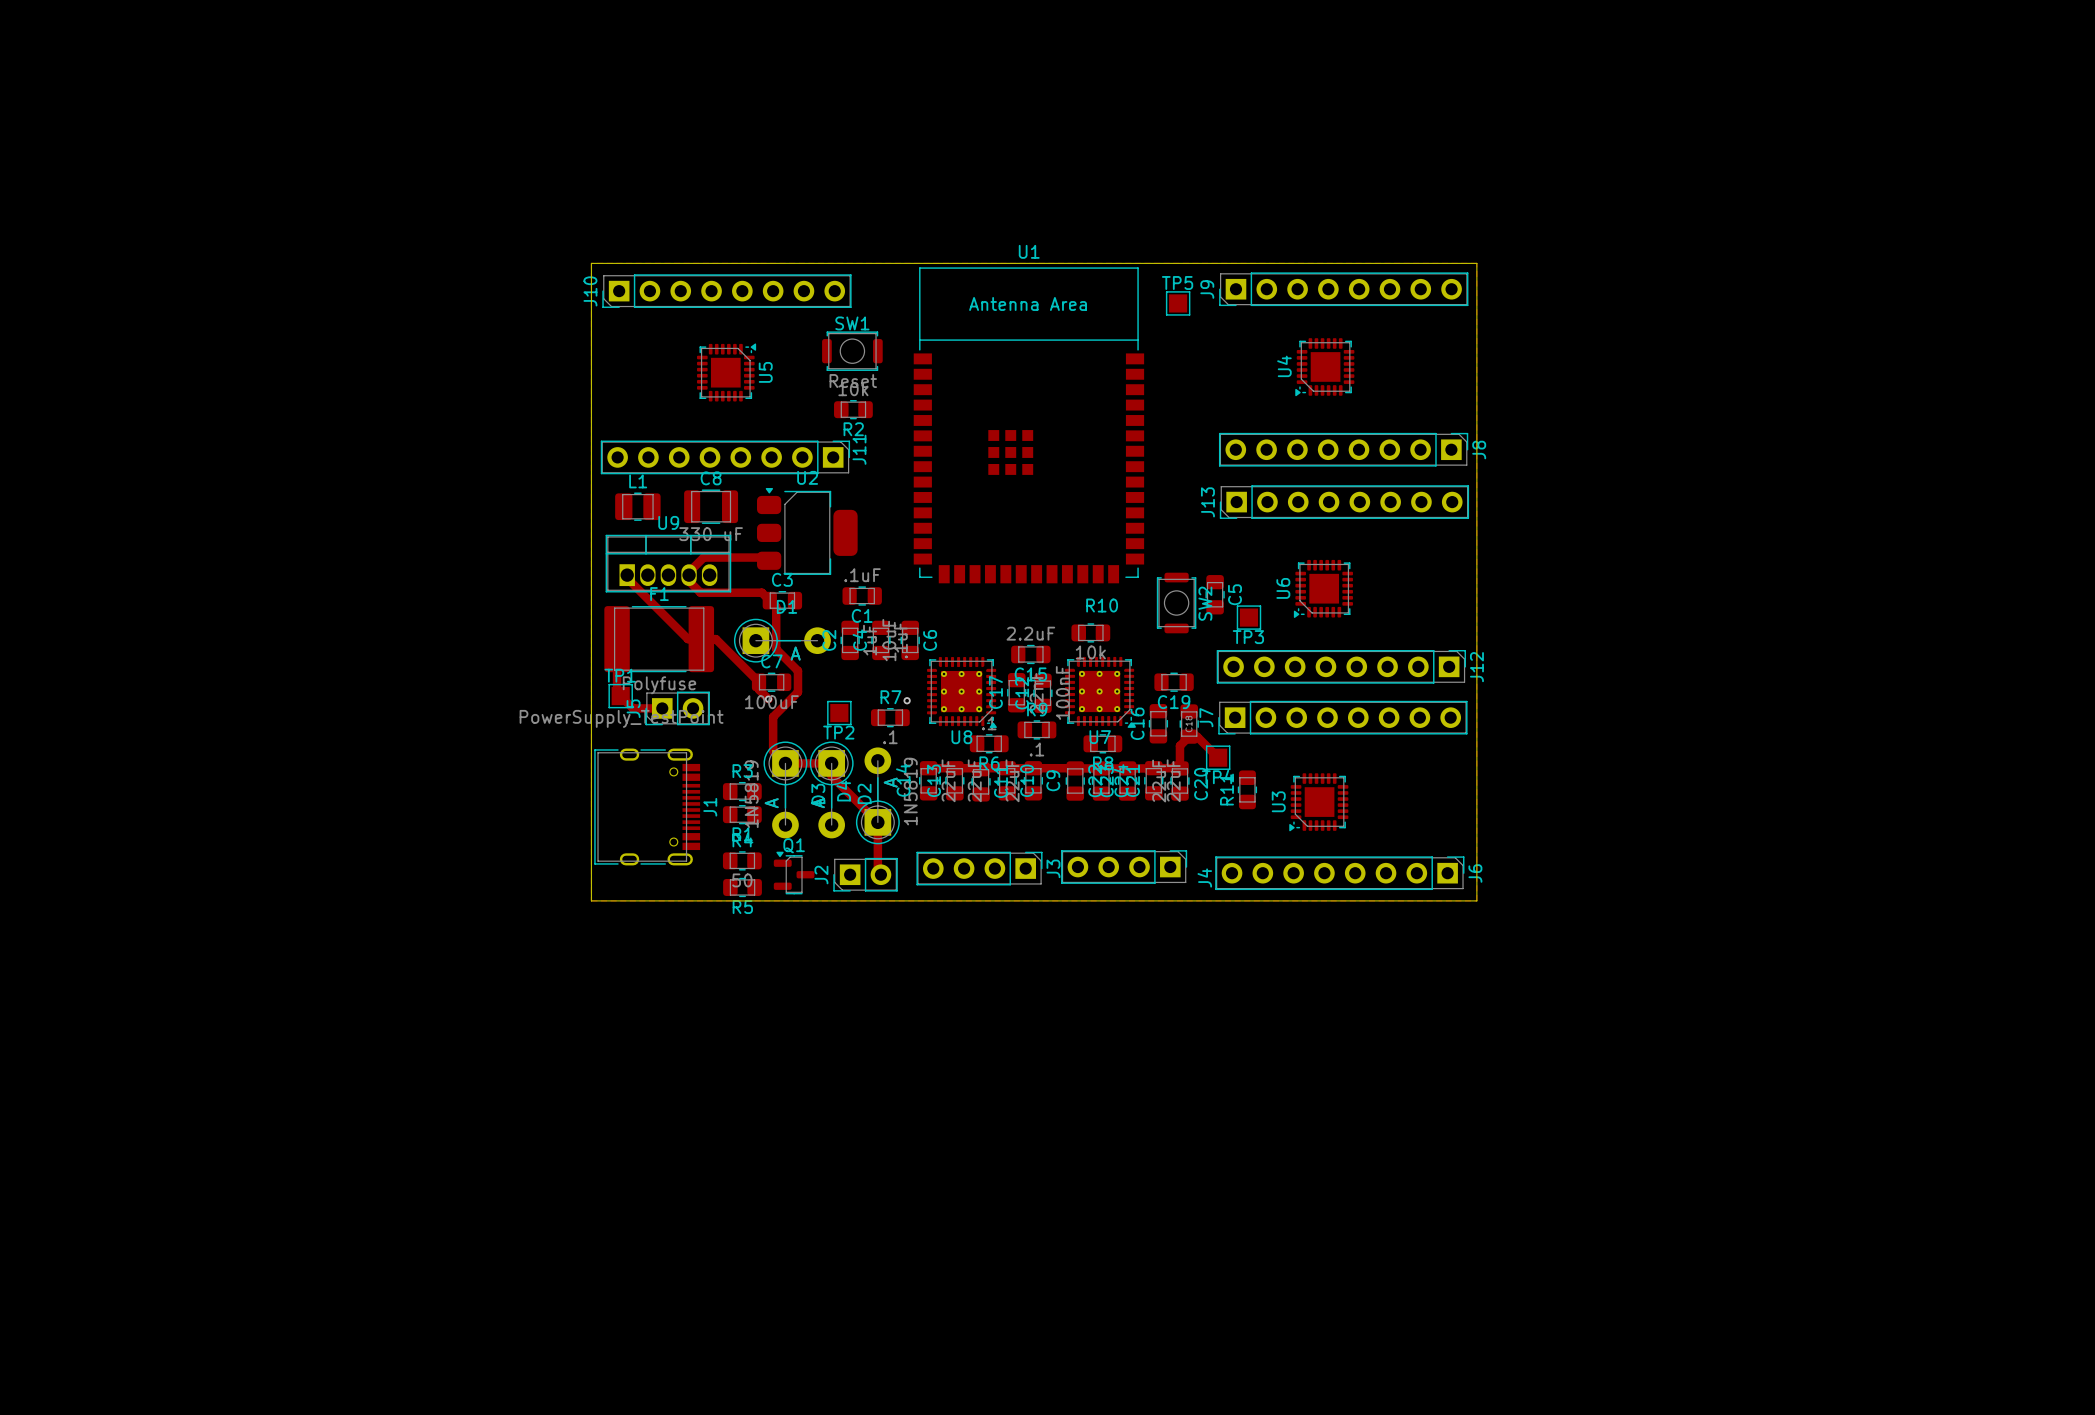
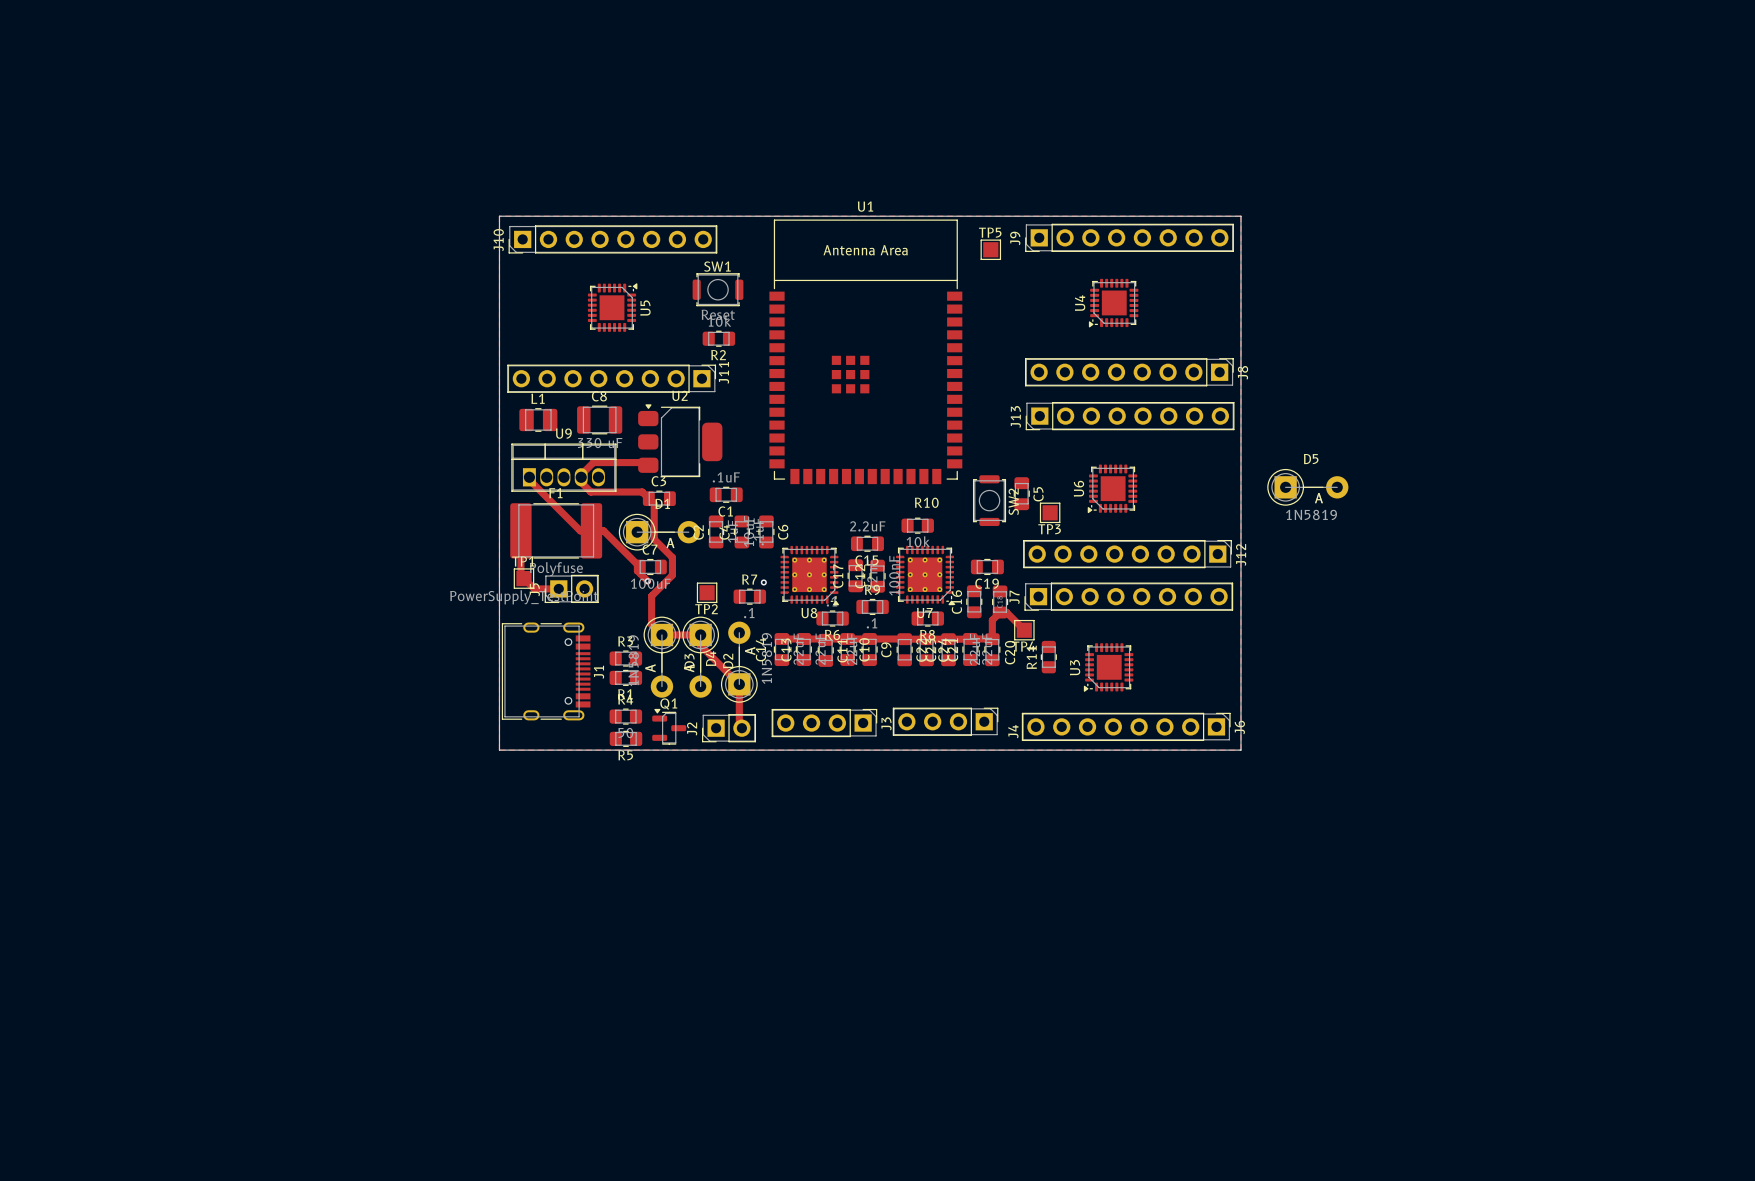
D5: none -> 1N5819 (1307, 487)

